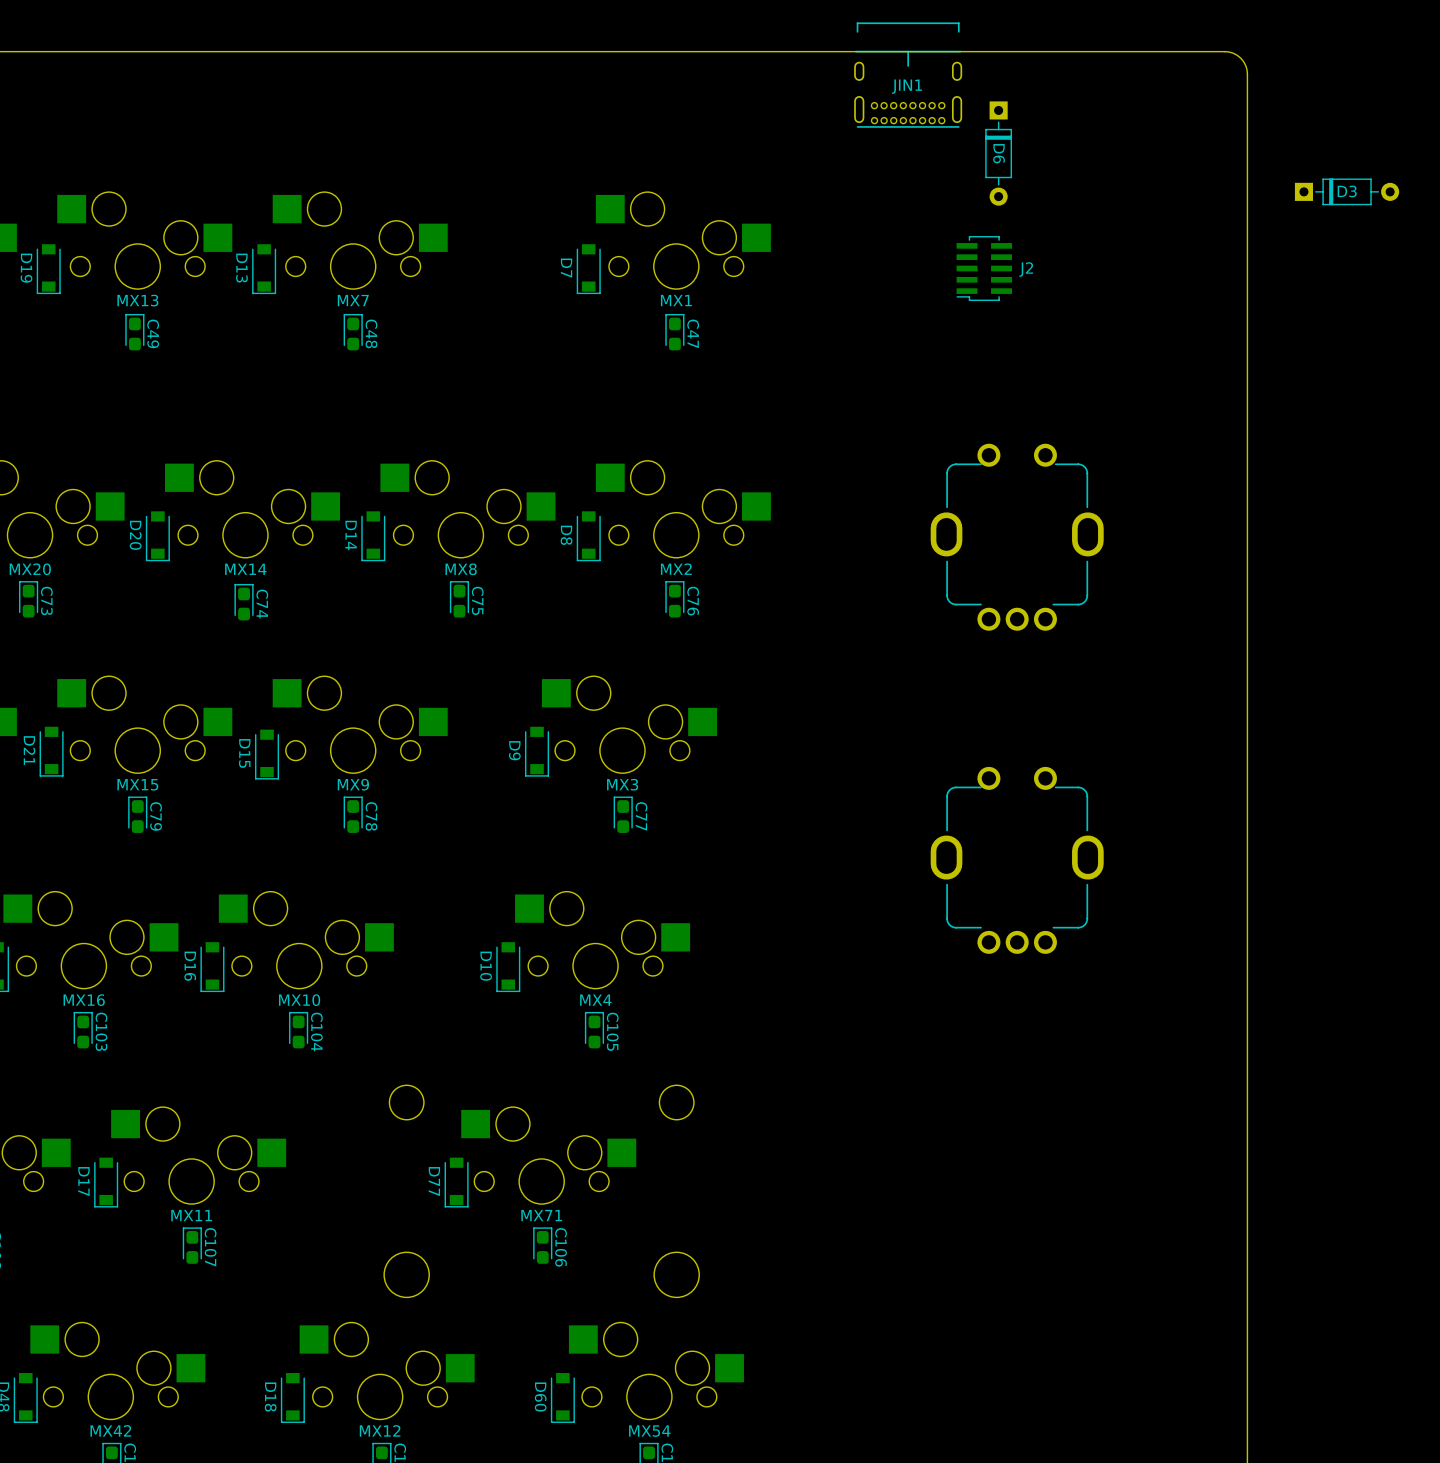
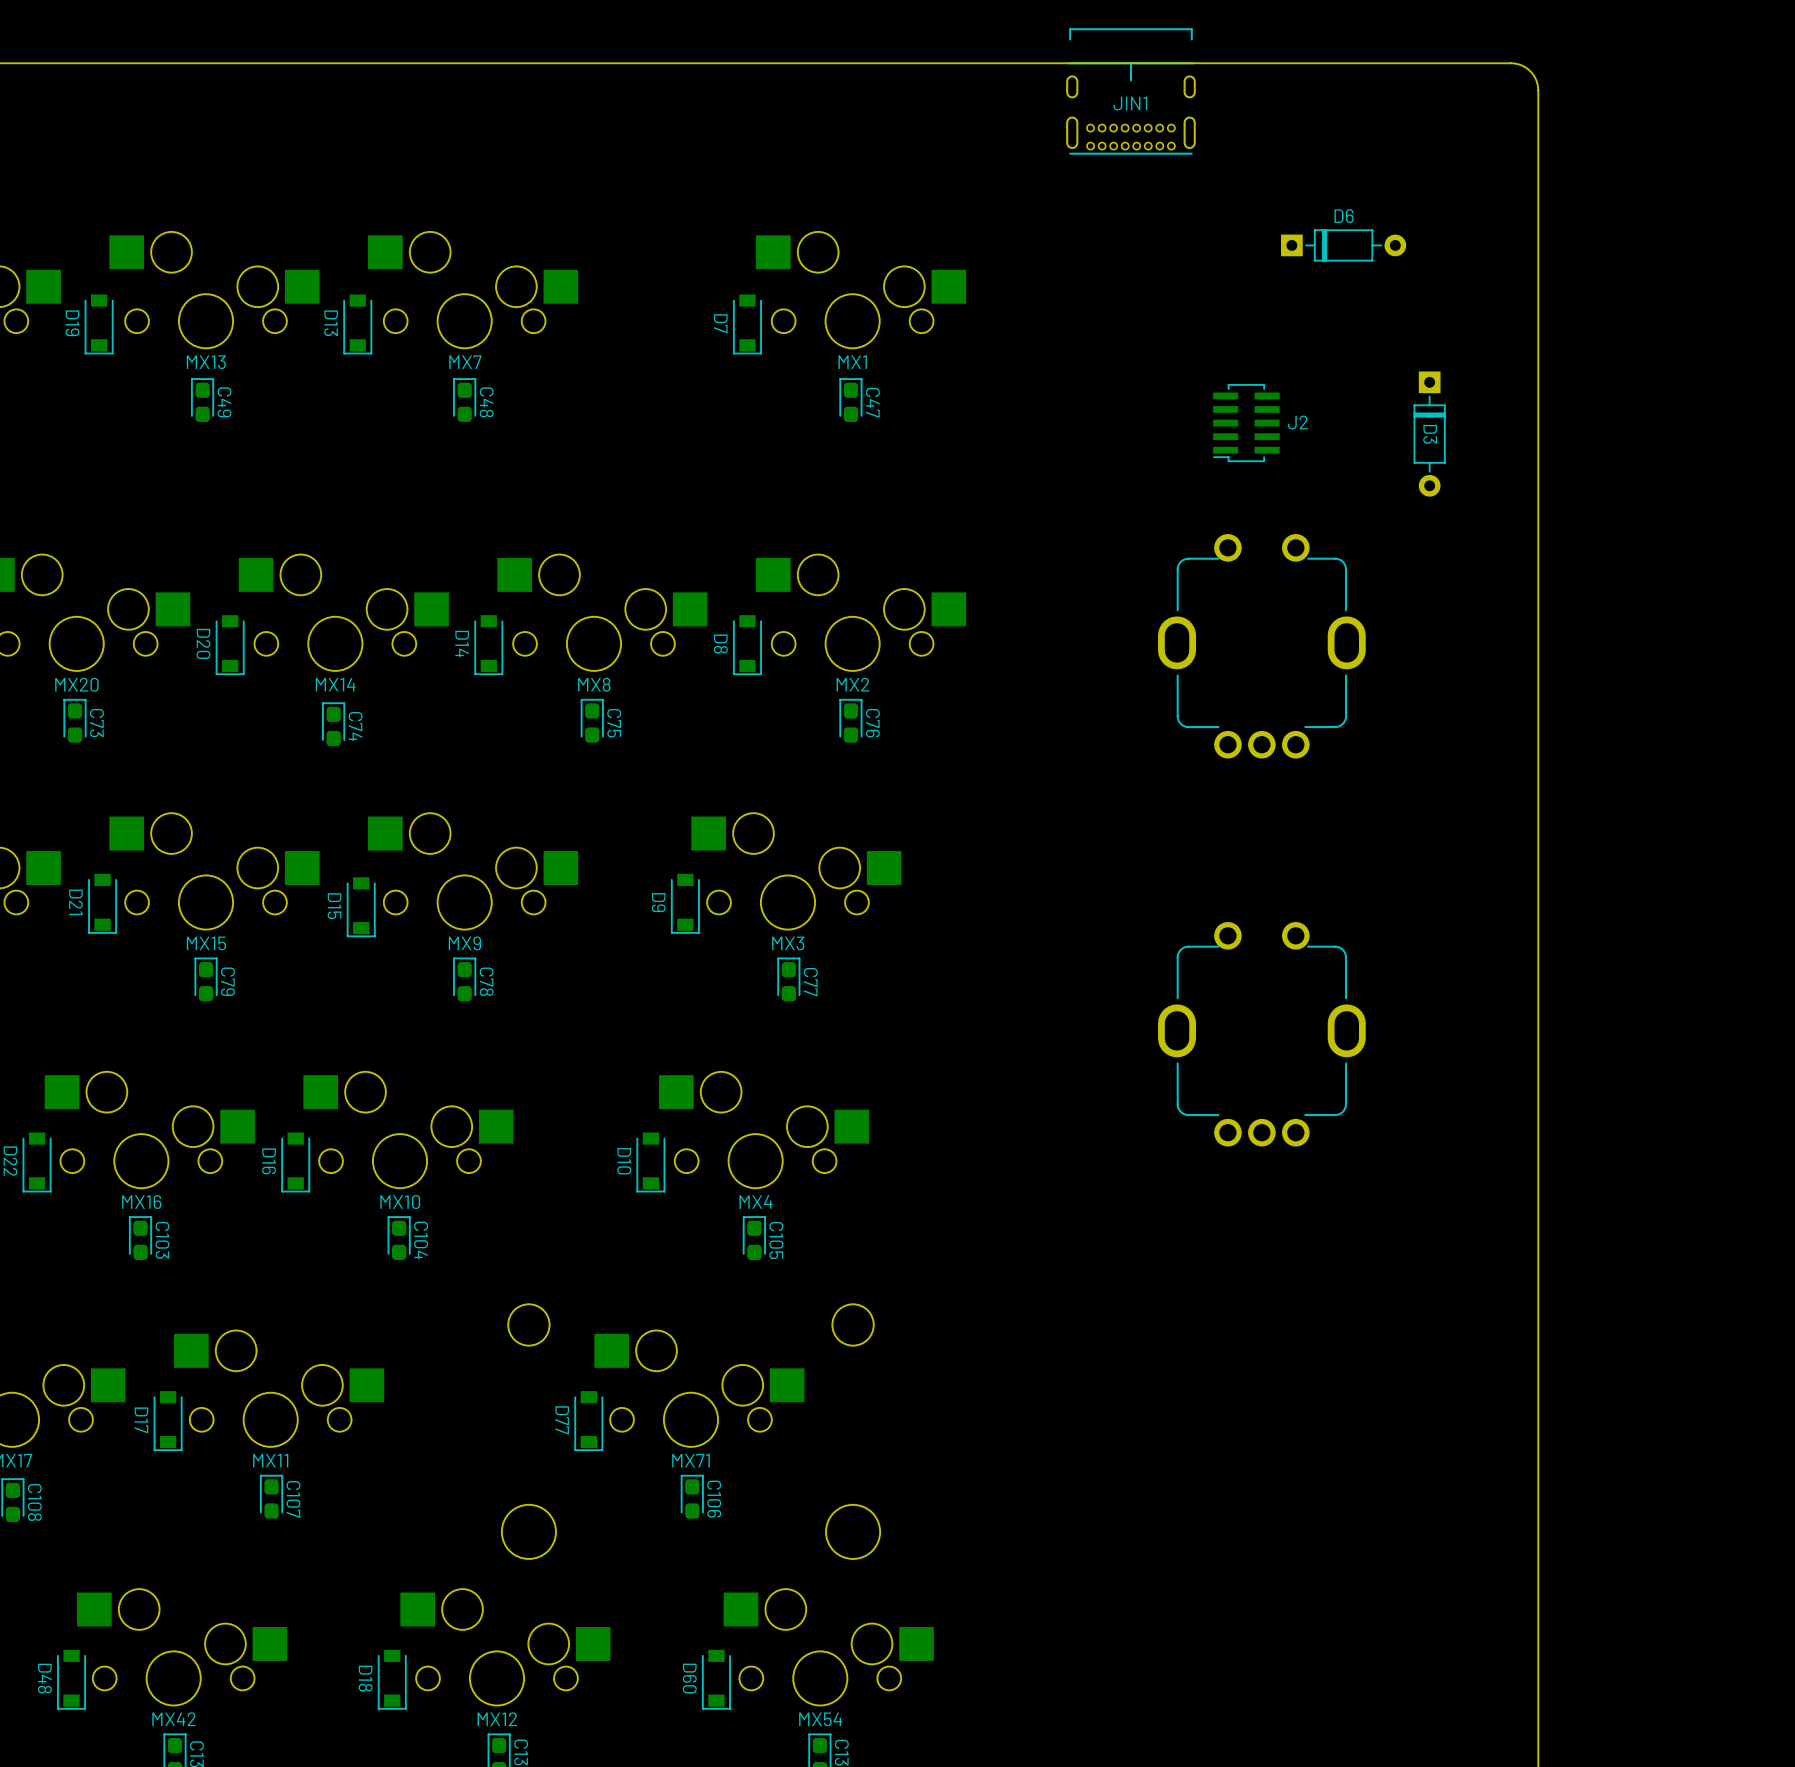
D6 rotation: 0° (998, 153) -> 90° counterclockwise (1343, 245)
D6 position: (998, 153) -> (1343, 245)
D6 name position: D6 (999, 153) -> D6 (1344, 216)
D3 rotation: 0° (1347, 191) -> 90° clockwise (1429, 434)
D3 position: (1347, 191) -> (1429, 434)
J2 position: (984, 268) -> (1246, 423)

